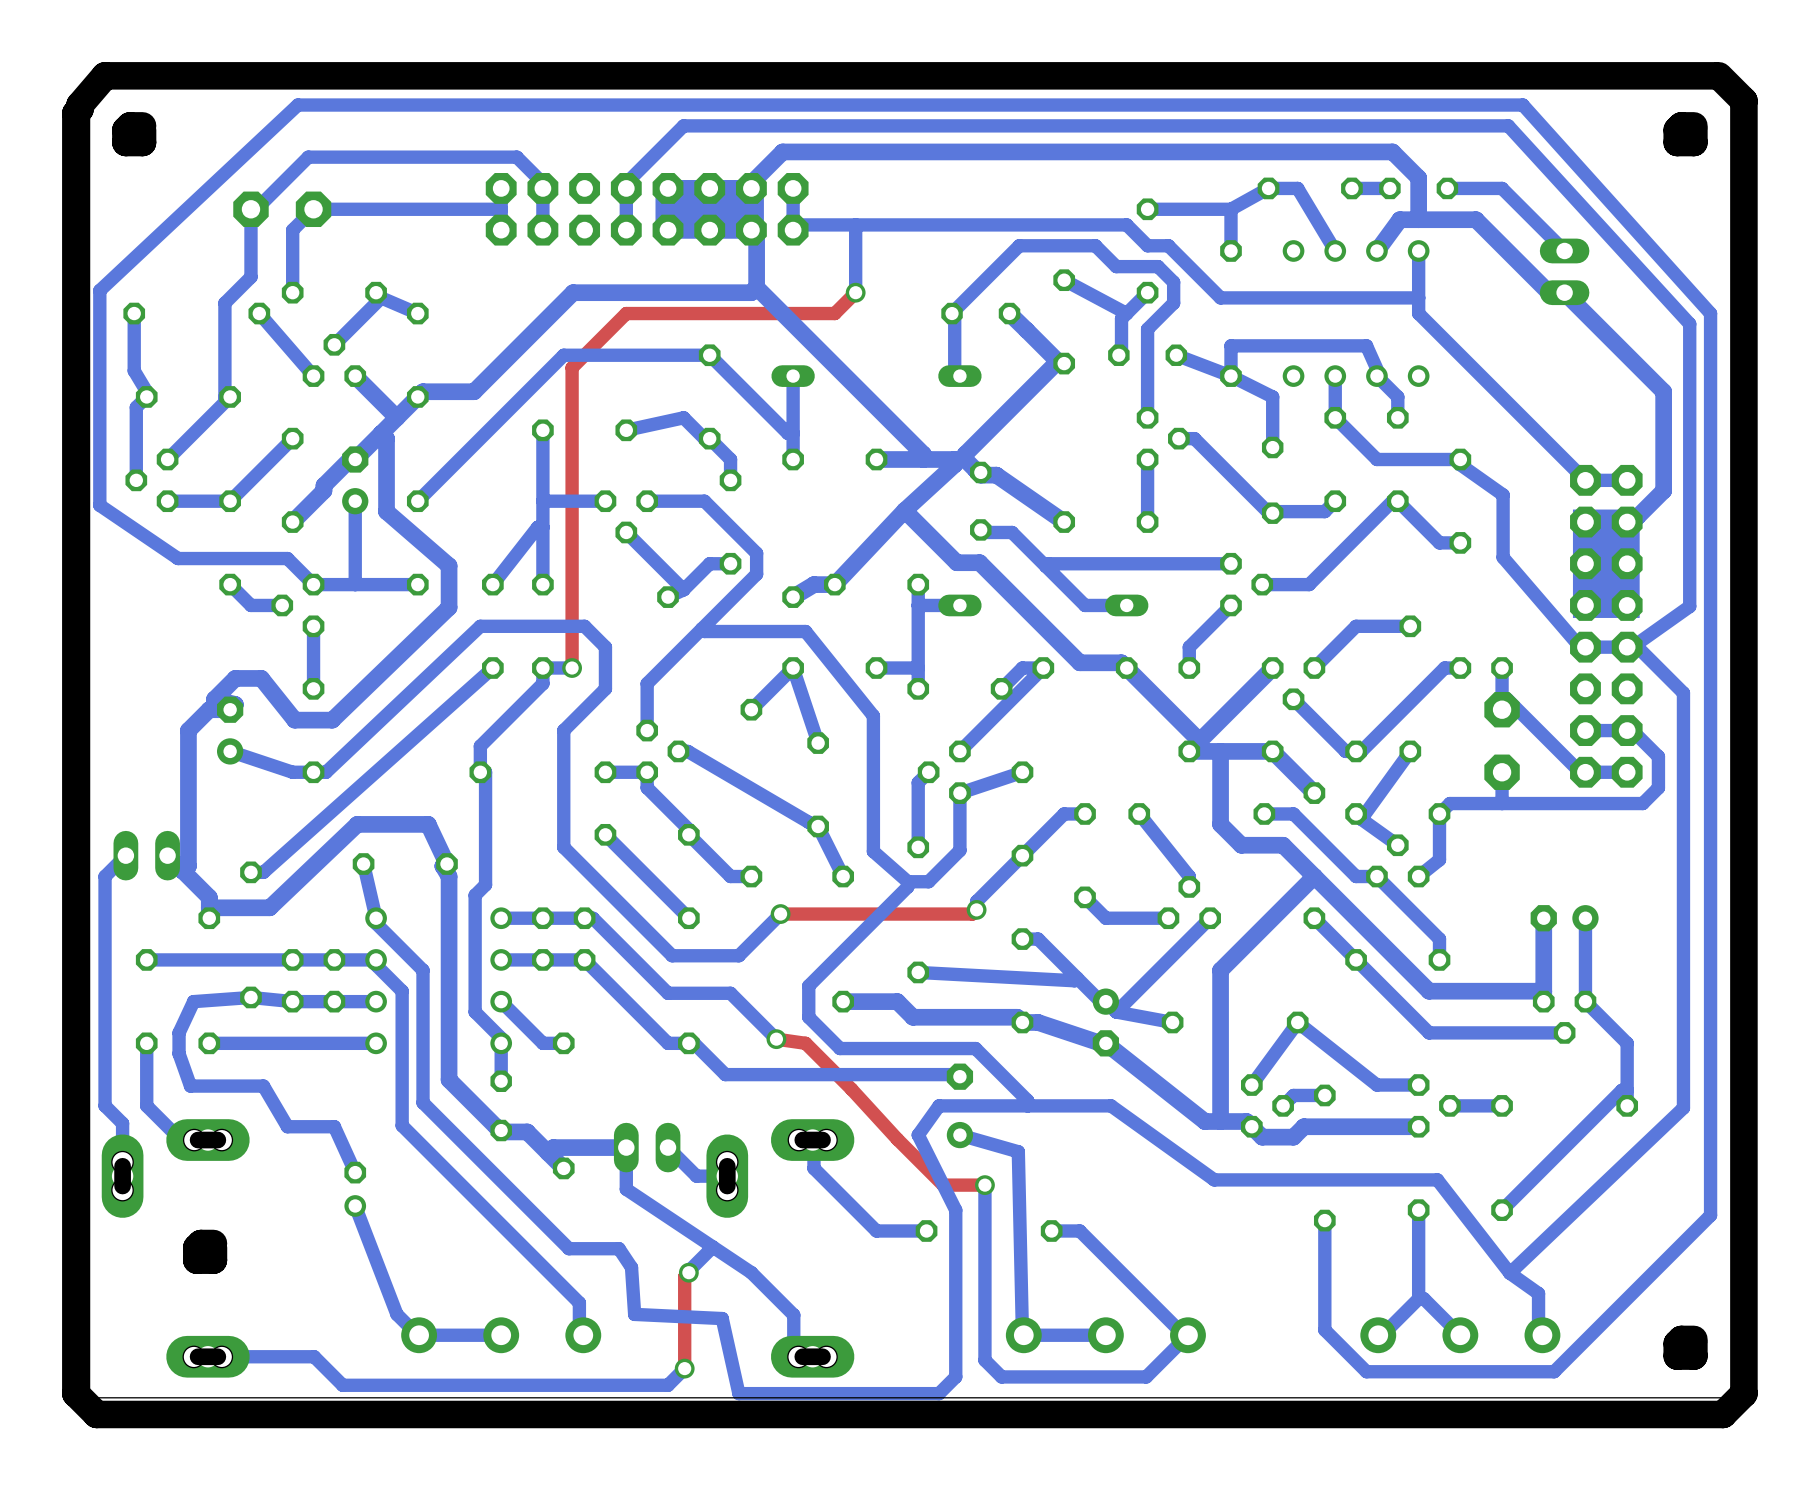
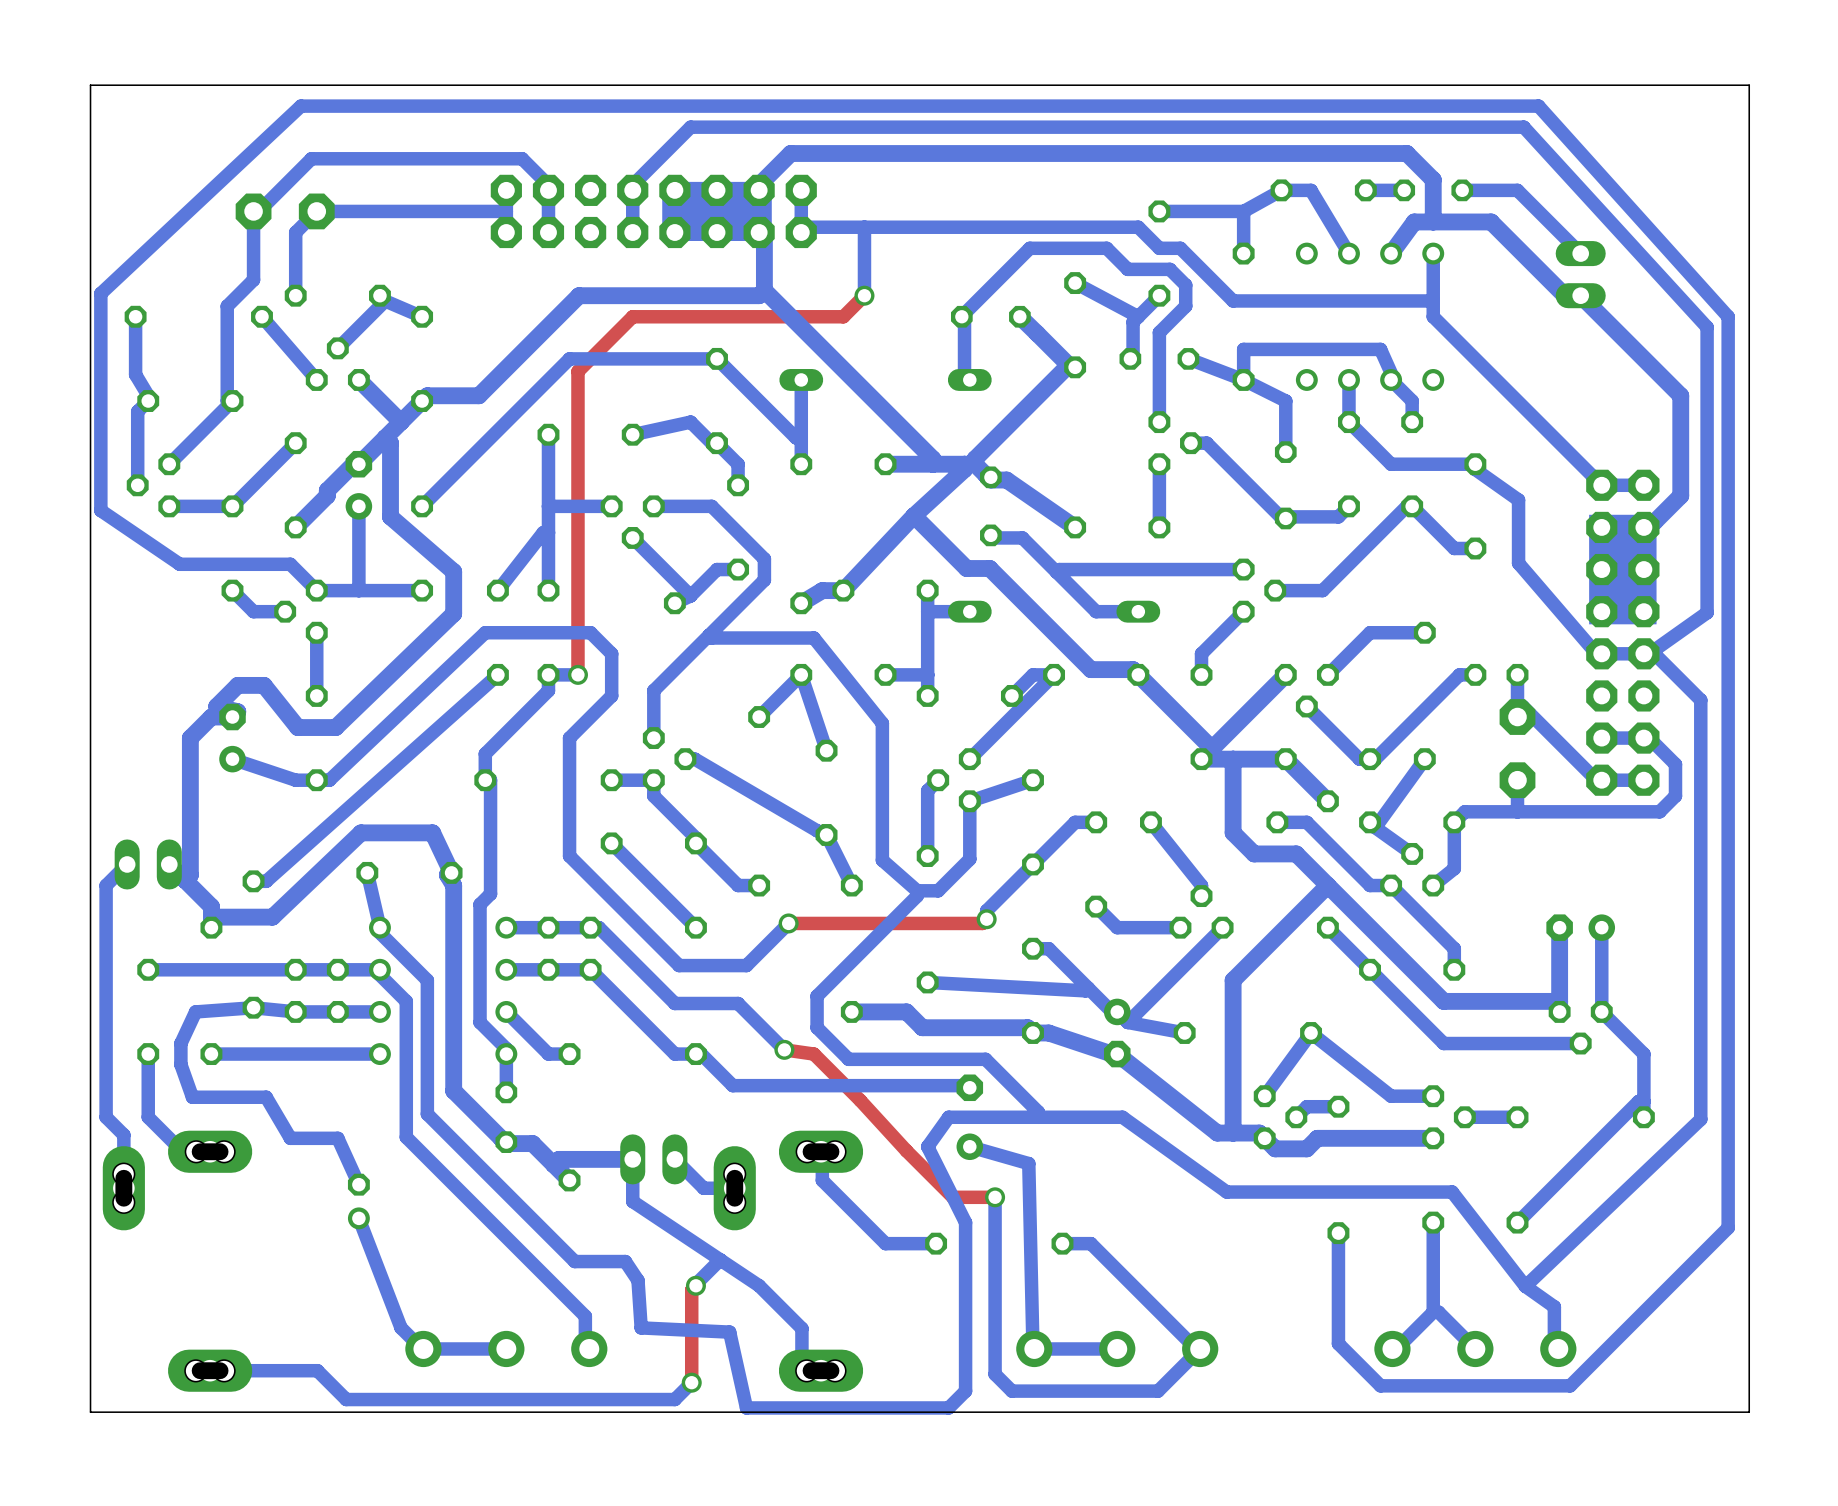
board edge: (1718, 75) (1743, 100) (1743, 1393) (1723, 1414) (96, 1414) (75, 1393) (75, 113) (80, 109) (80, 105) (105, 75) (1714, 75) -> none
board edge: (142, 125) (130, 125) (125, 130) (125, 142) (142, 142) (142, 130) -> none
board edge: (1693, 125) (1681, 125) (1677, 130) (1677, 142) (1693, 142) (1693, 130) -> none
board edge: (213, 1243) (200, 1243) (196, 1247) (196, 1260) (213, 1260) (213, 1247) -> none
board edge: (1693, 1339) (1681, 1339) (1677, 1343) (1677, 1356) (1693, 1356) (1693, 1343) -> none

